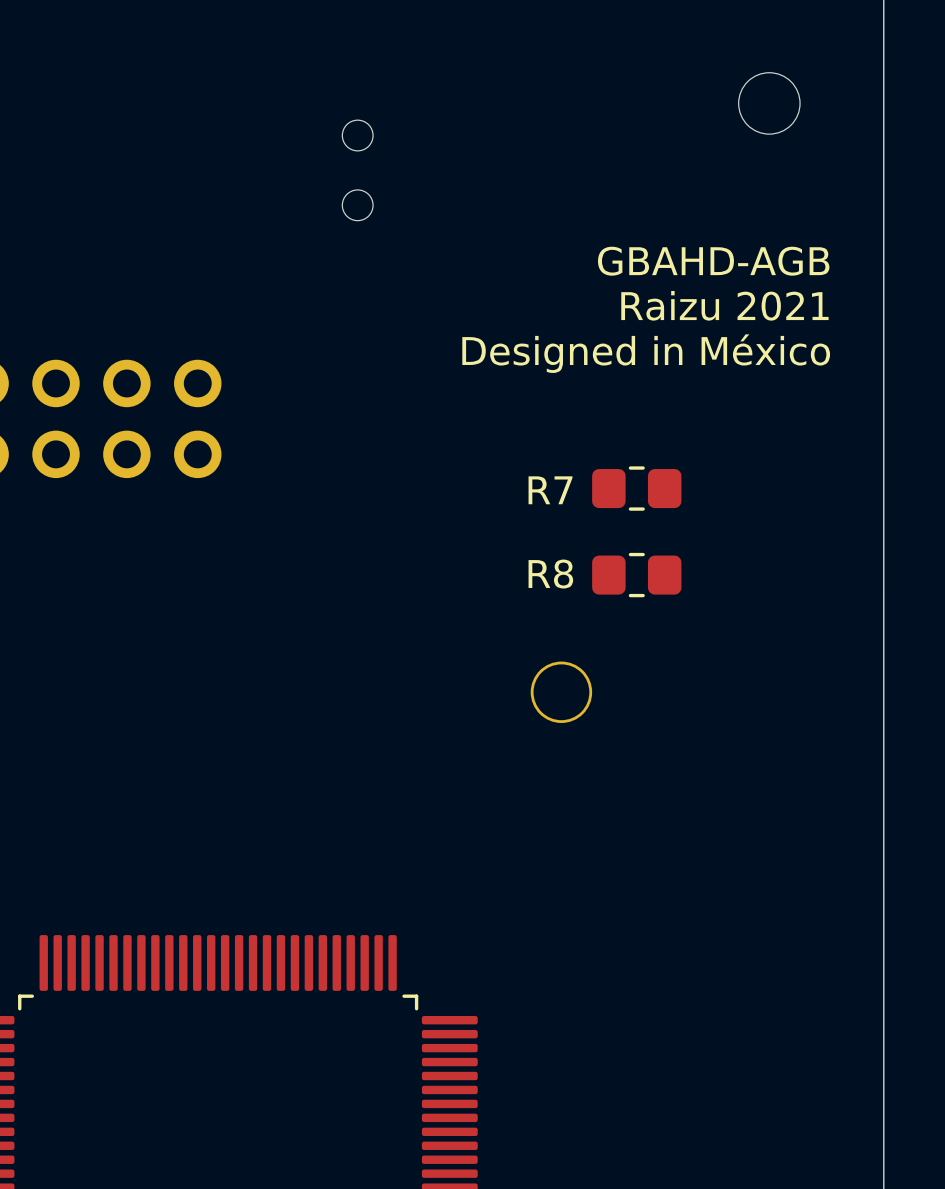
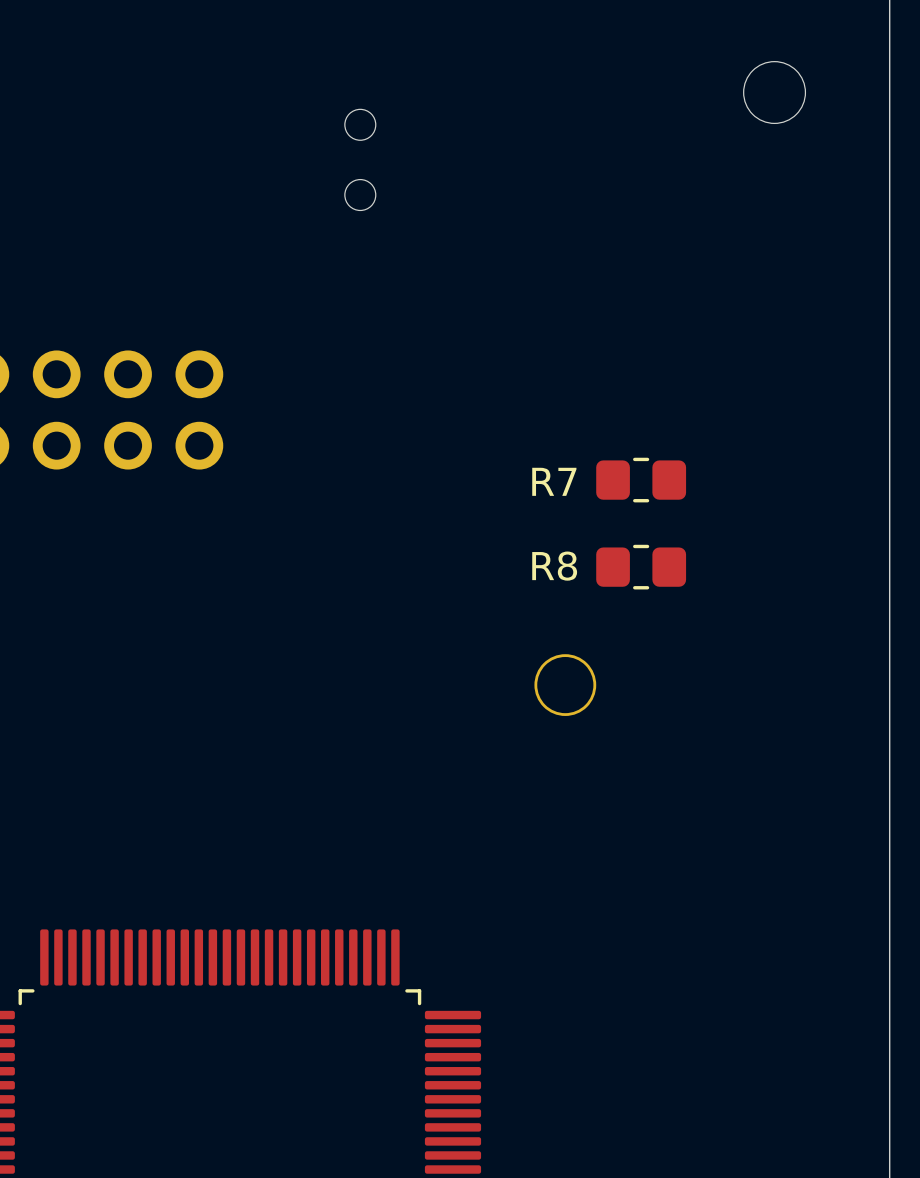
text: GBAHD-AGB (713, 261) -> none
text: Raizu 2021 (724, 305) -> none
text: Designed in México (646, 353) -> none

